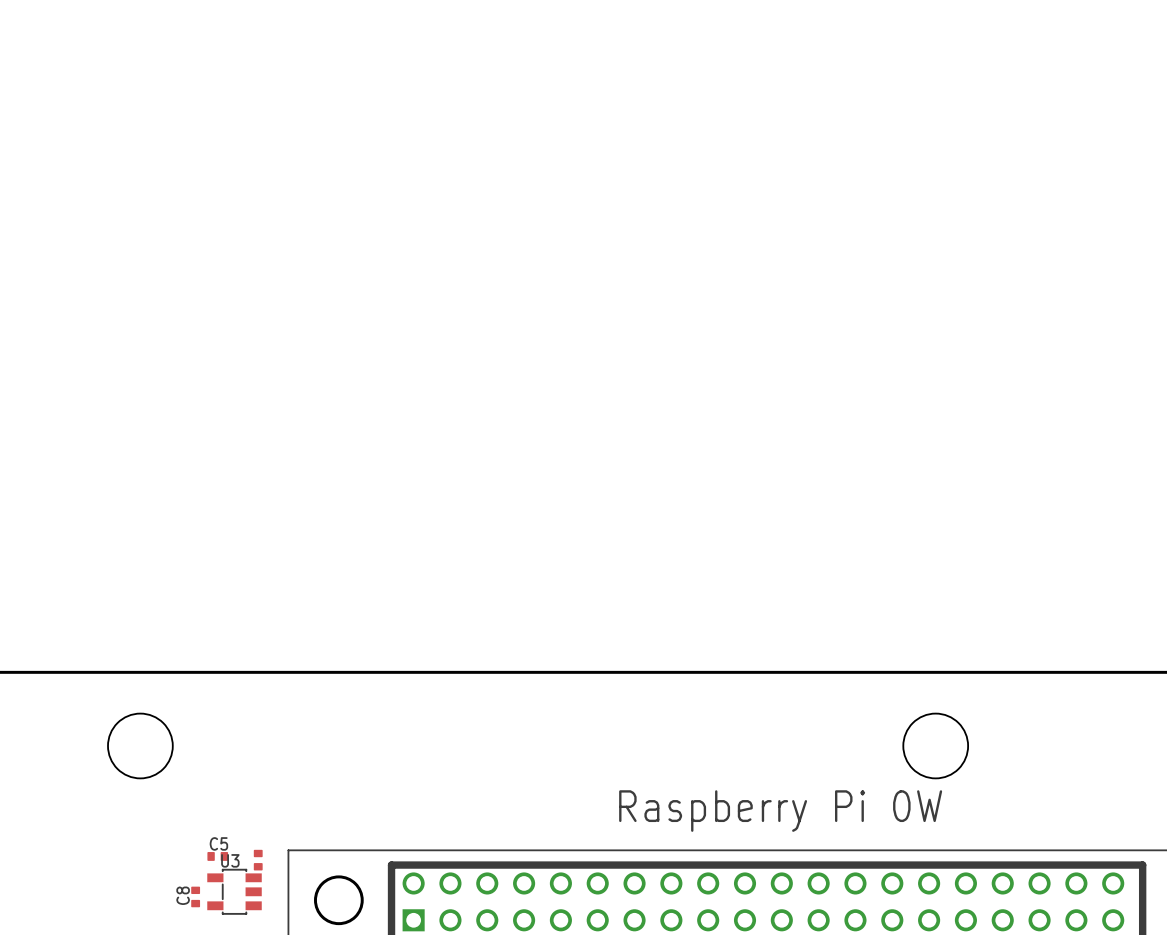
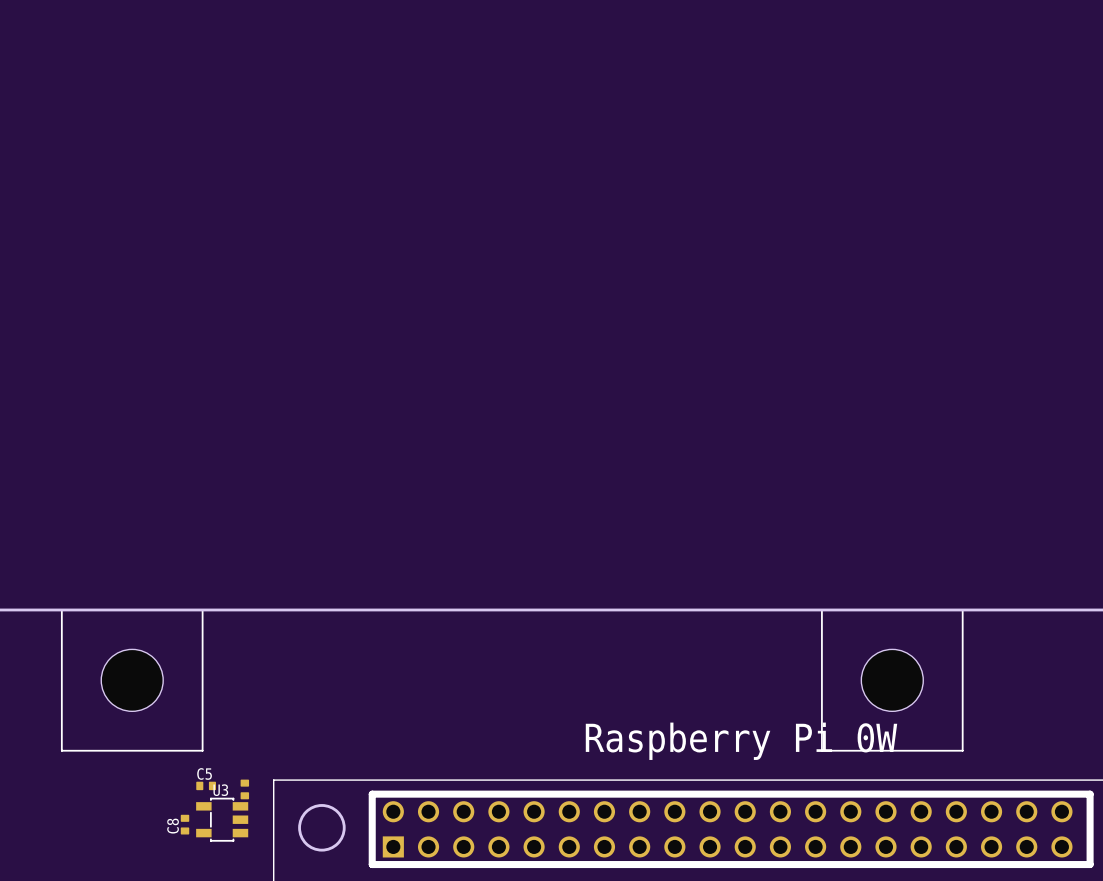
line: none -> (61, 609) (61, 750) (202, 750) (202, 609)
line: none -> (821, 609) (821, 750) (962, 750) (962, 609)

